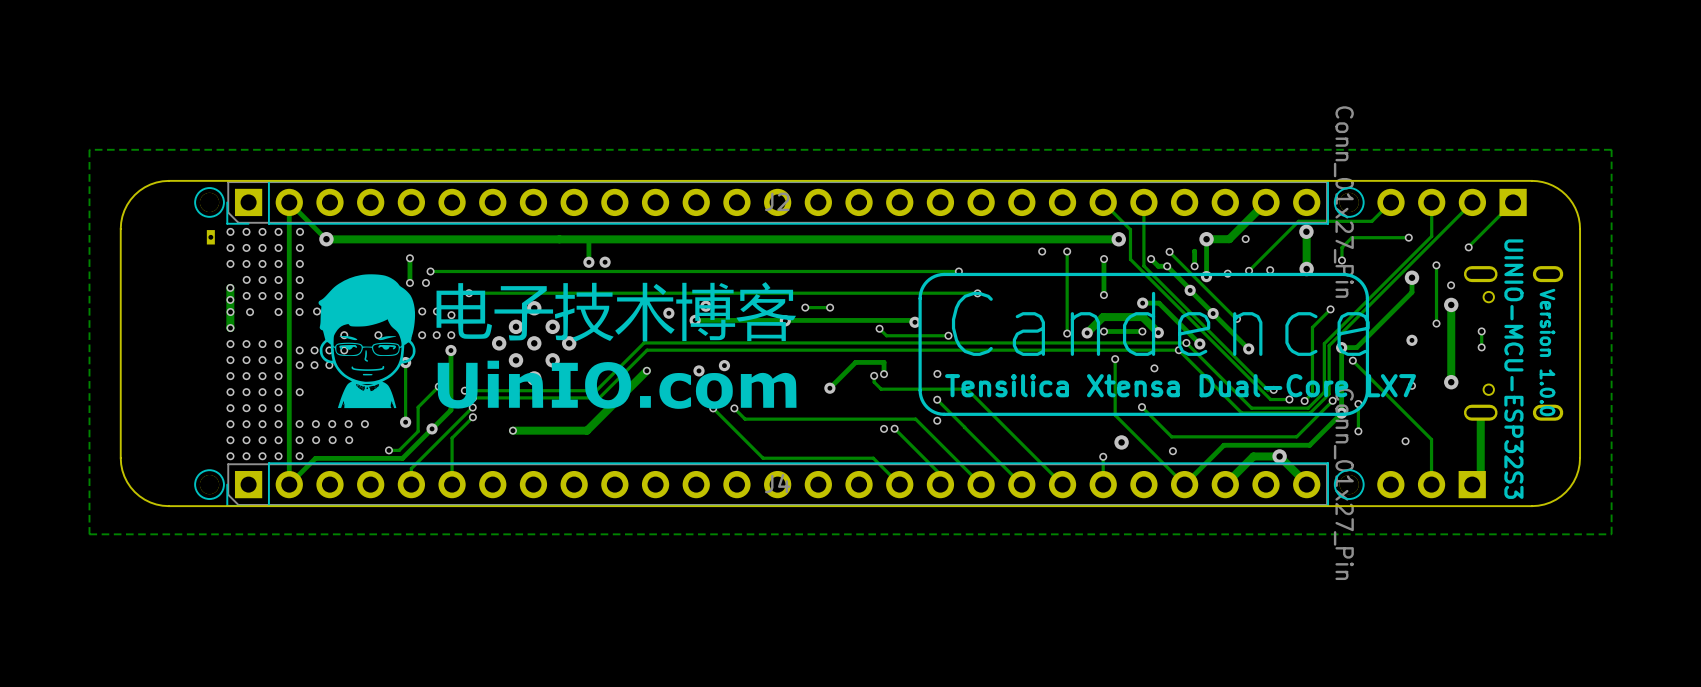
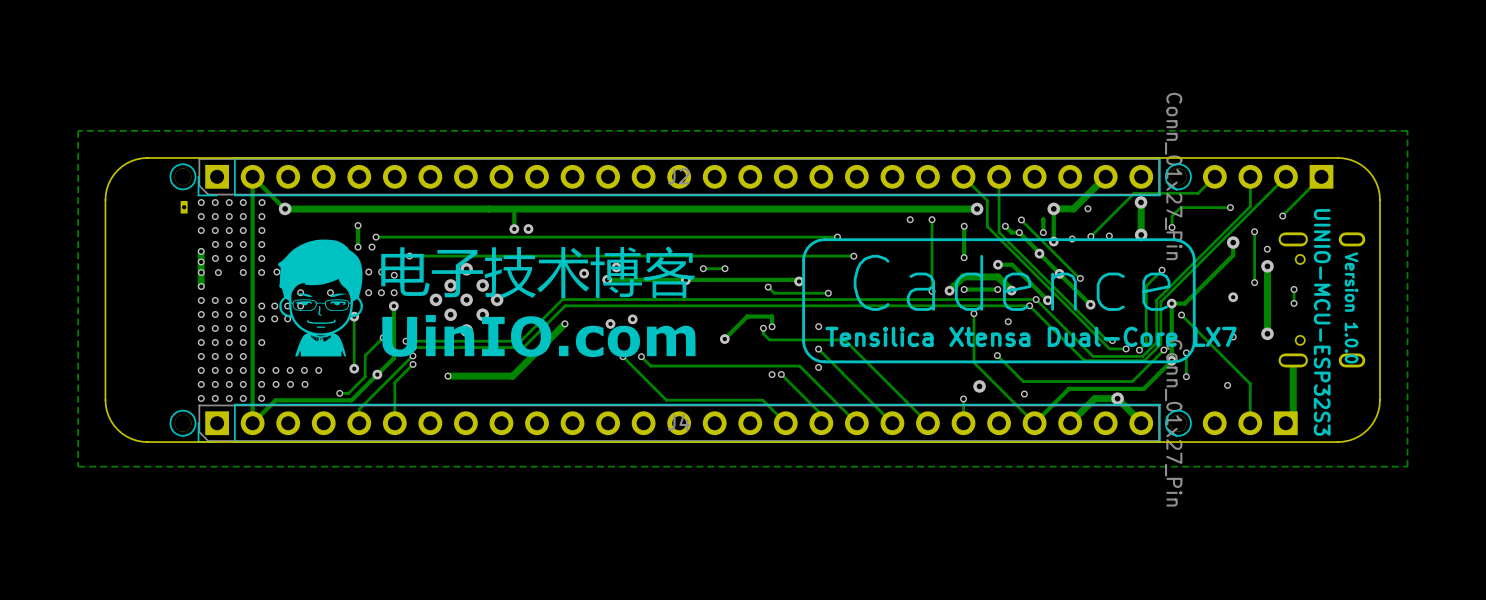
text: Candence (1160, 323) -> Cadence (1012, 282)

